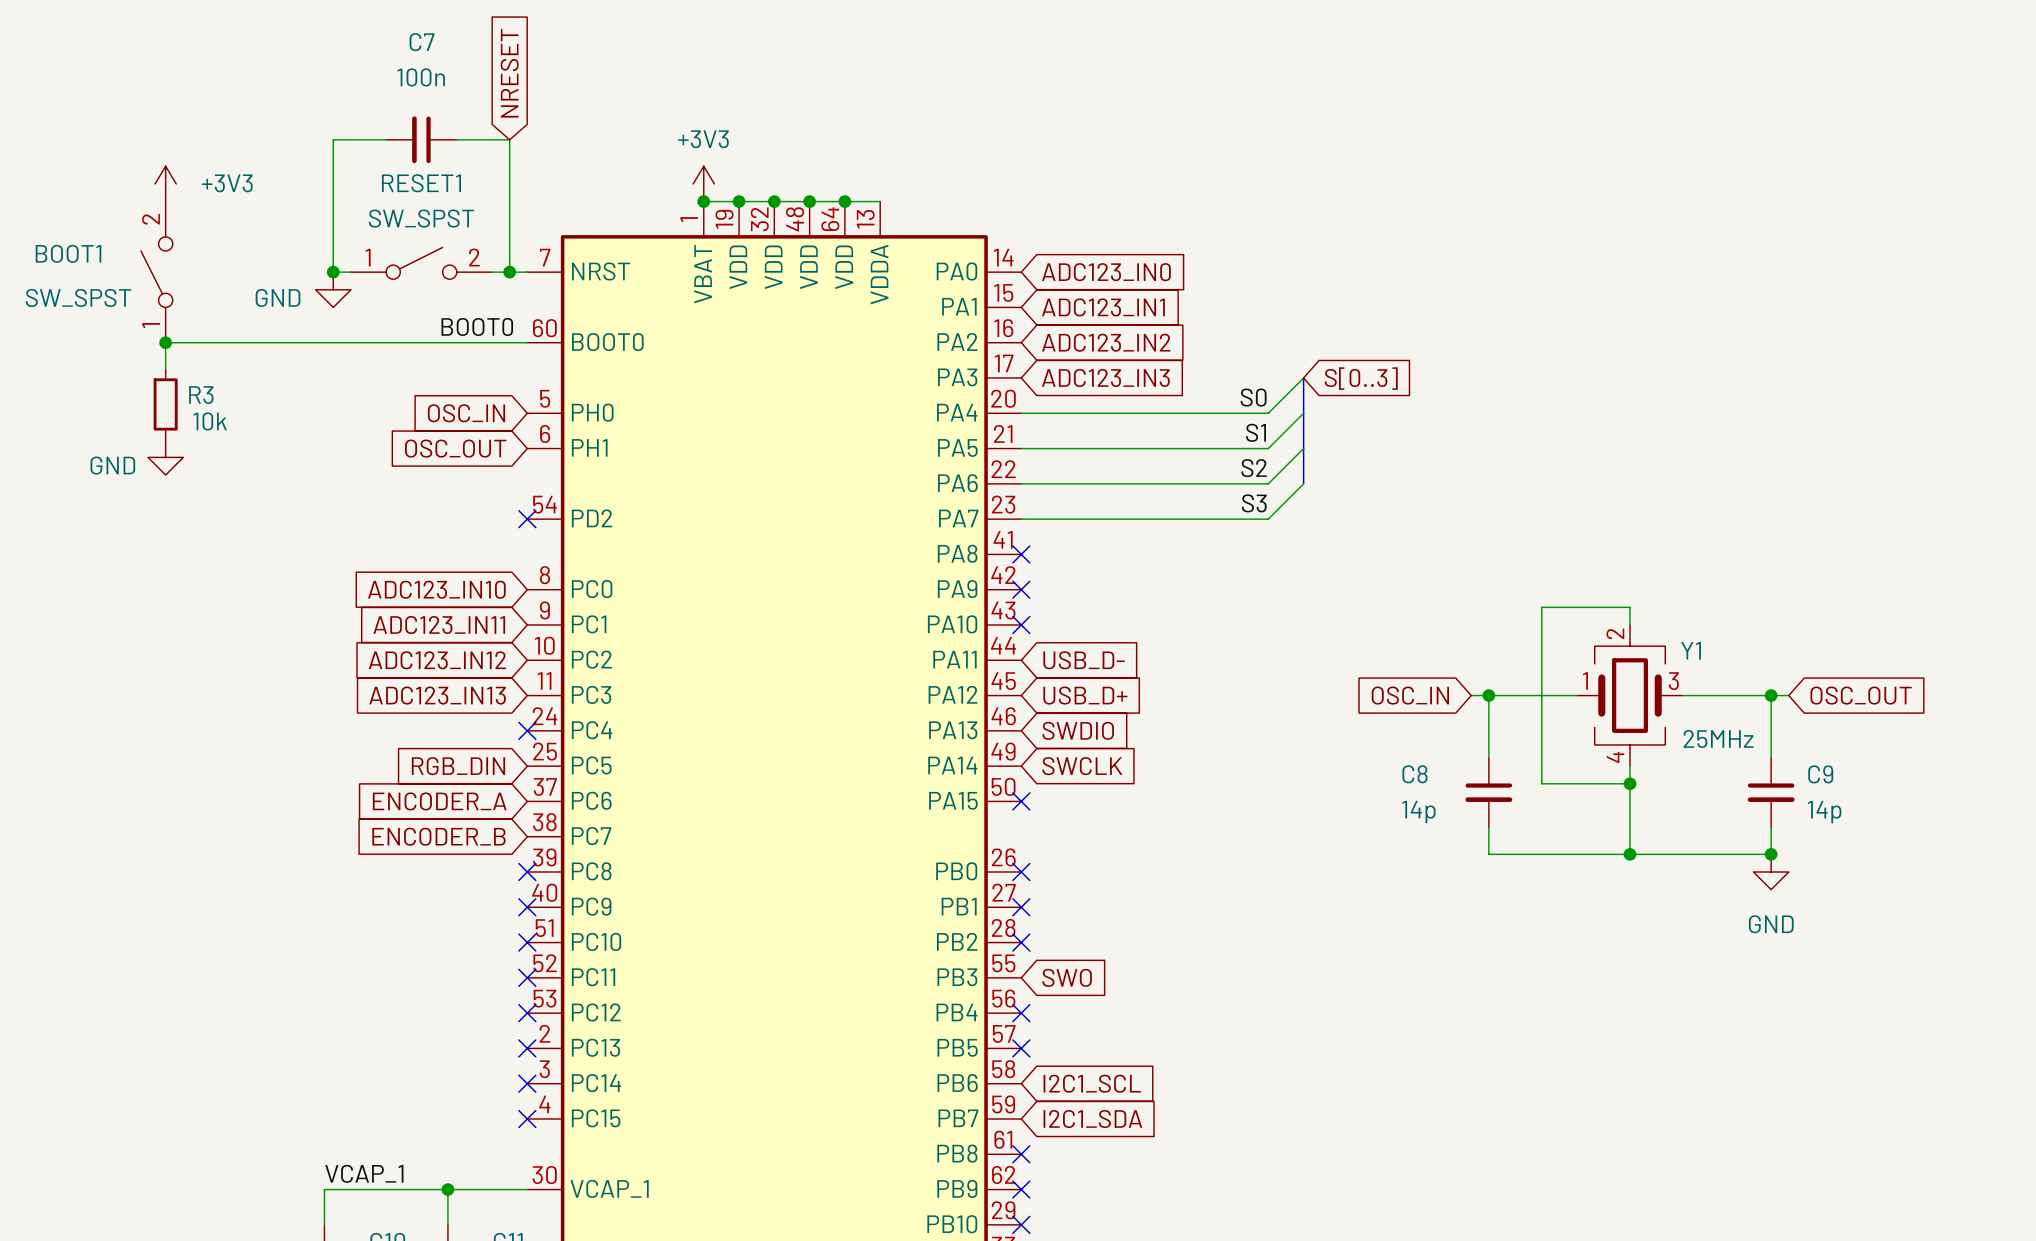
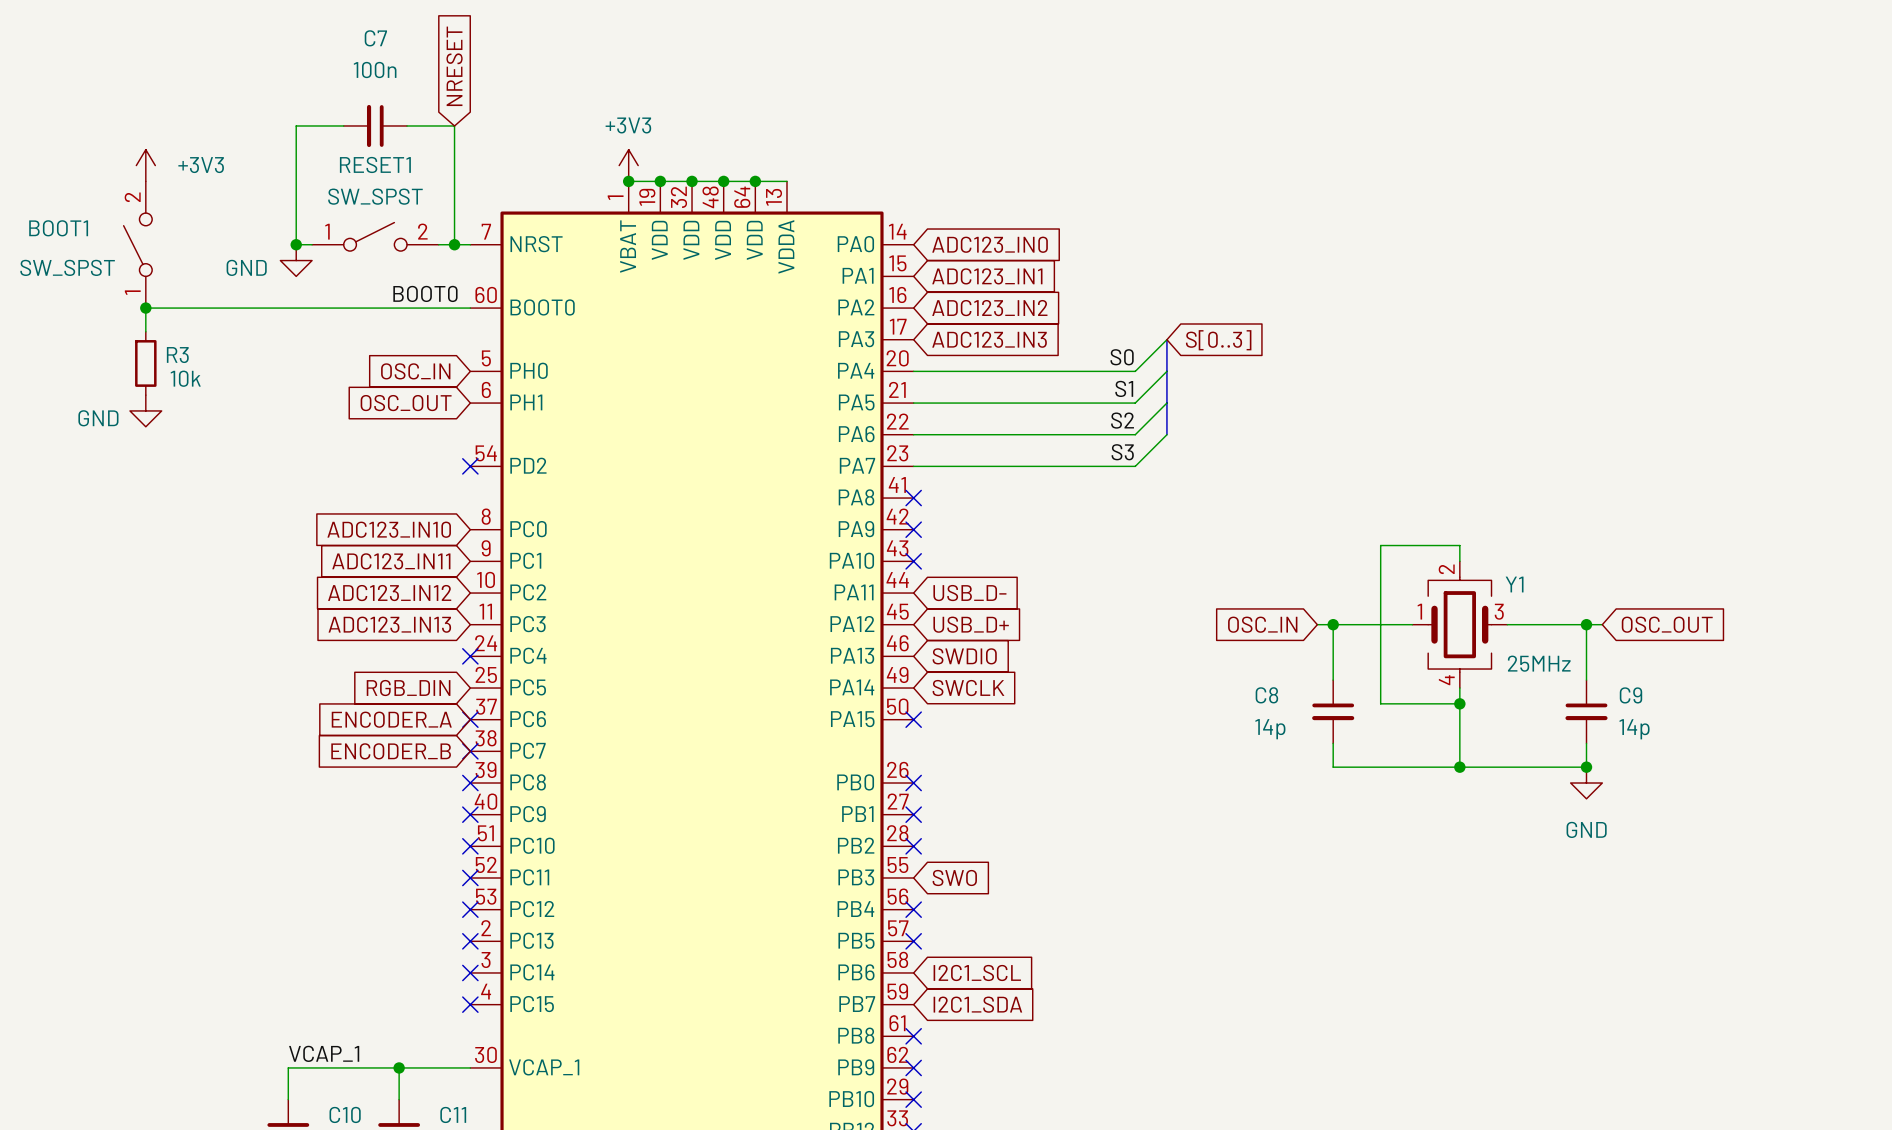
no-connect mark: none -> (470, 719)
no-connect mark: none -> (470, 751)

